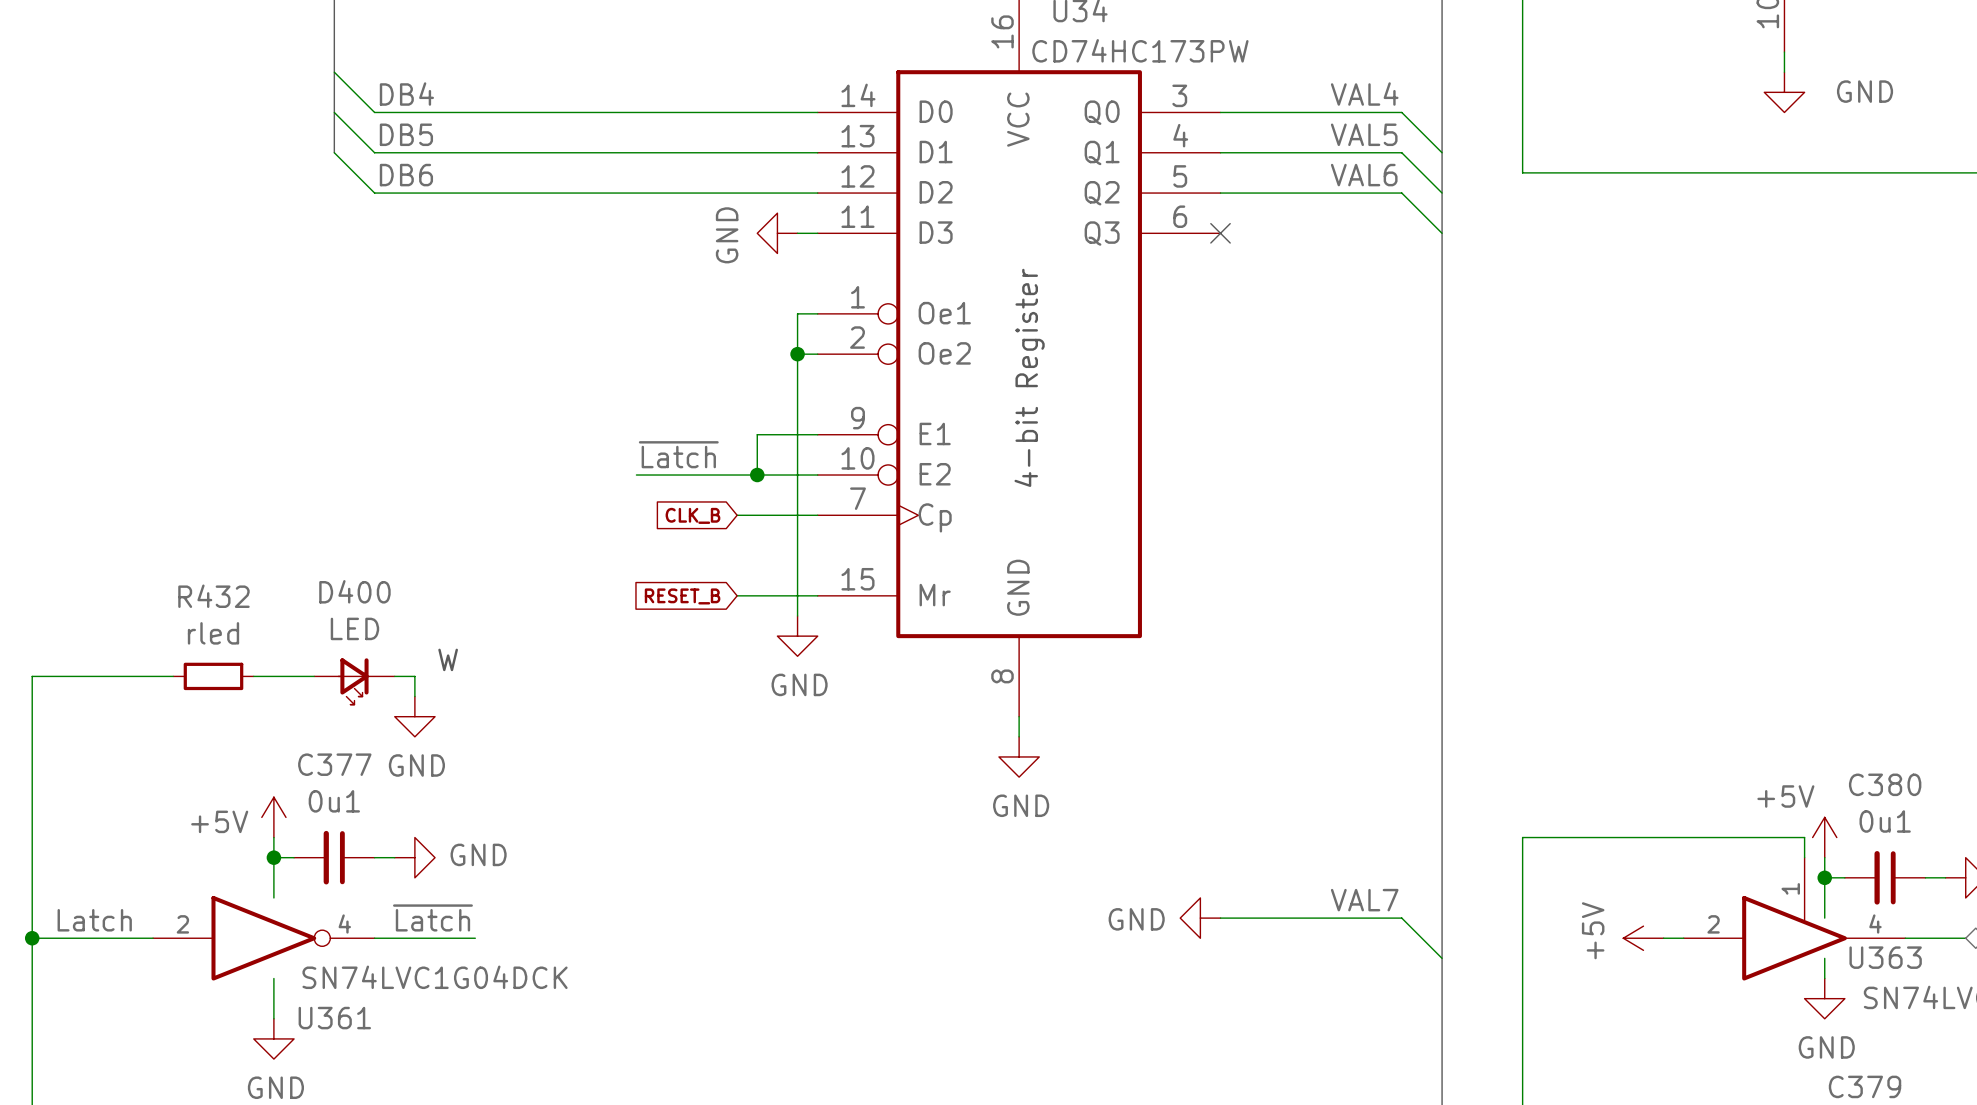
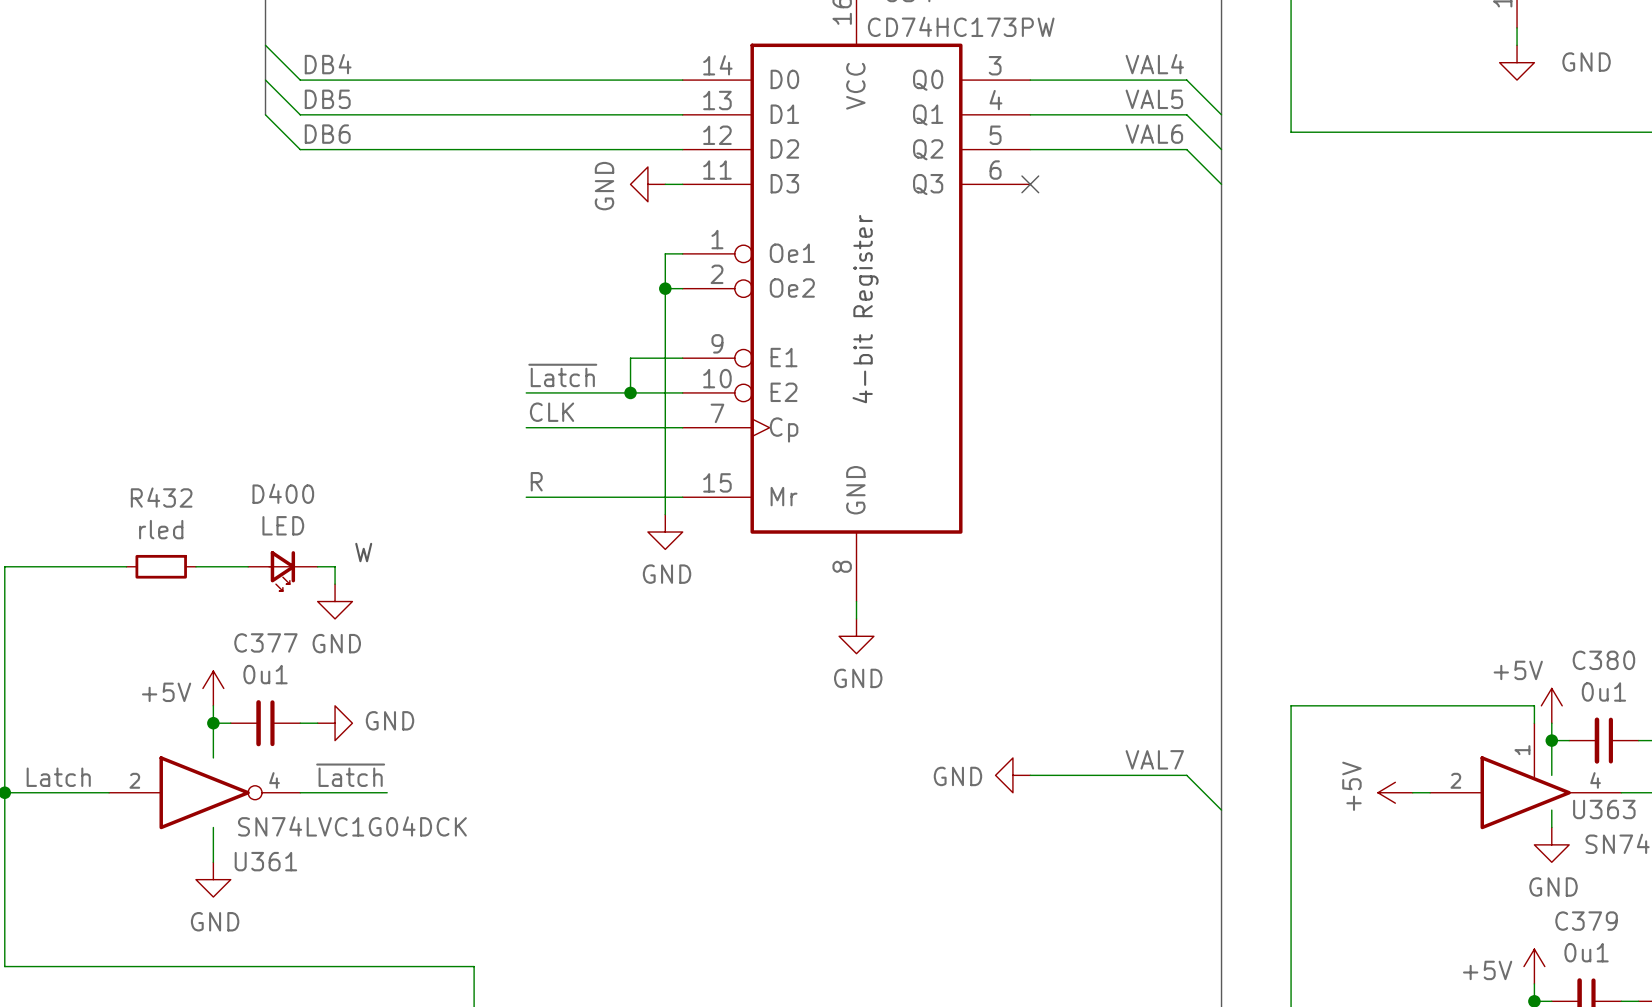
label: none -> CLK (552, 412)
wire: none -> (526, 427) (613, 427)
global label: CLK_B (692, 515) -> none
label: none -> R (536, 481)
wire: none -> (526, 497) (613, 497)
global label: RESET_B (682, 596) -> none

